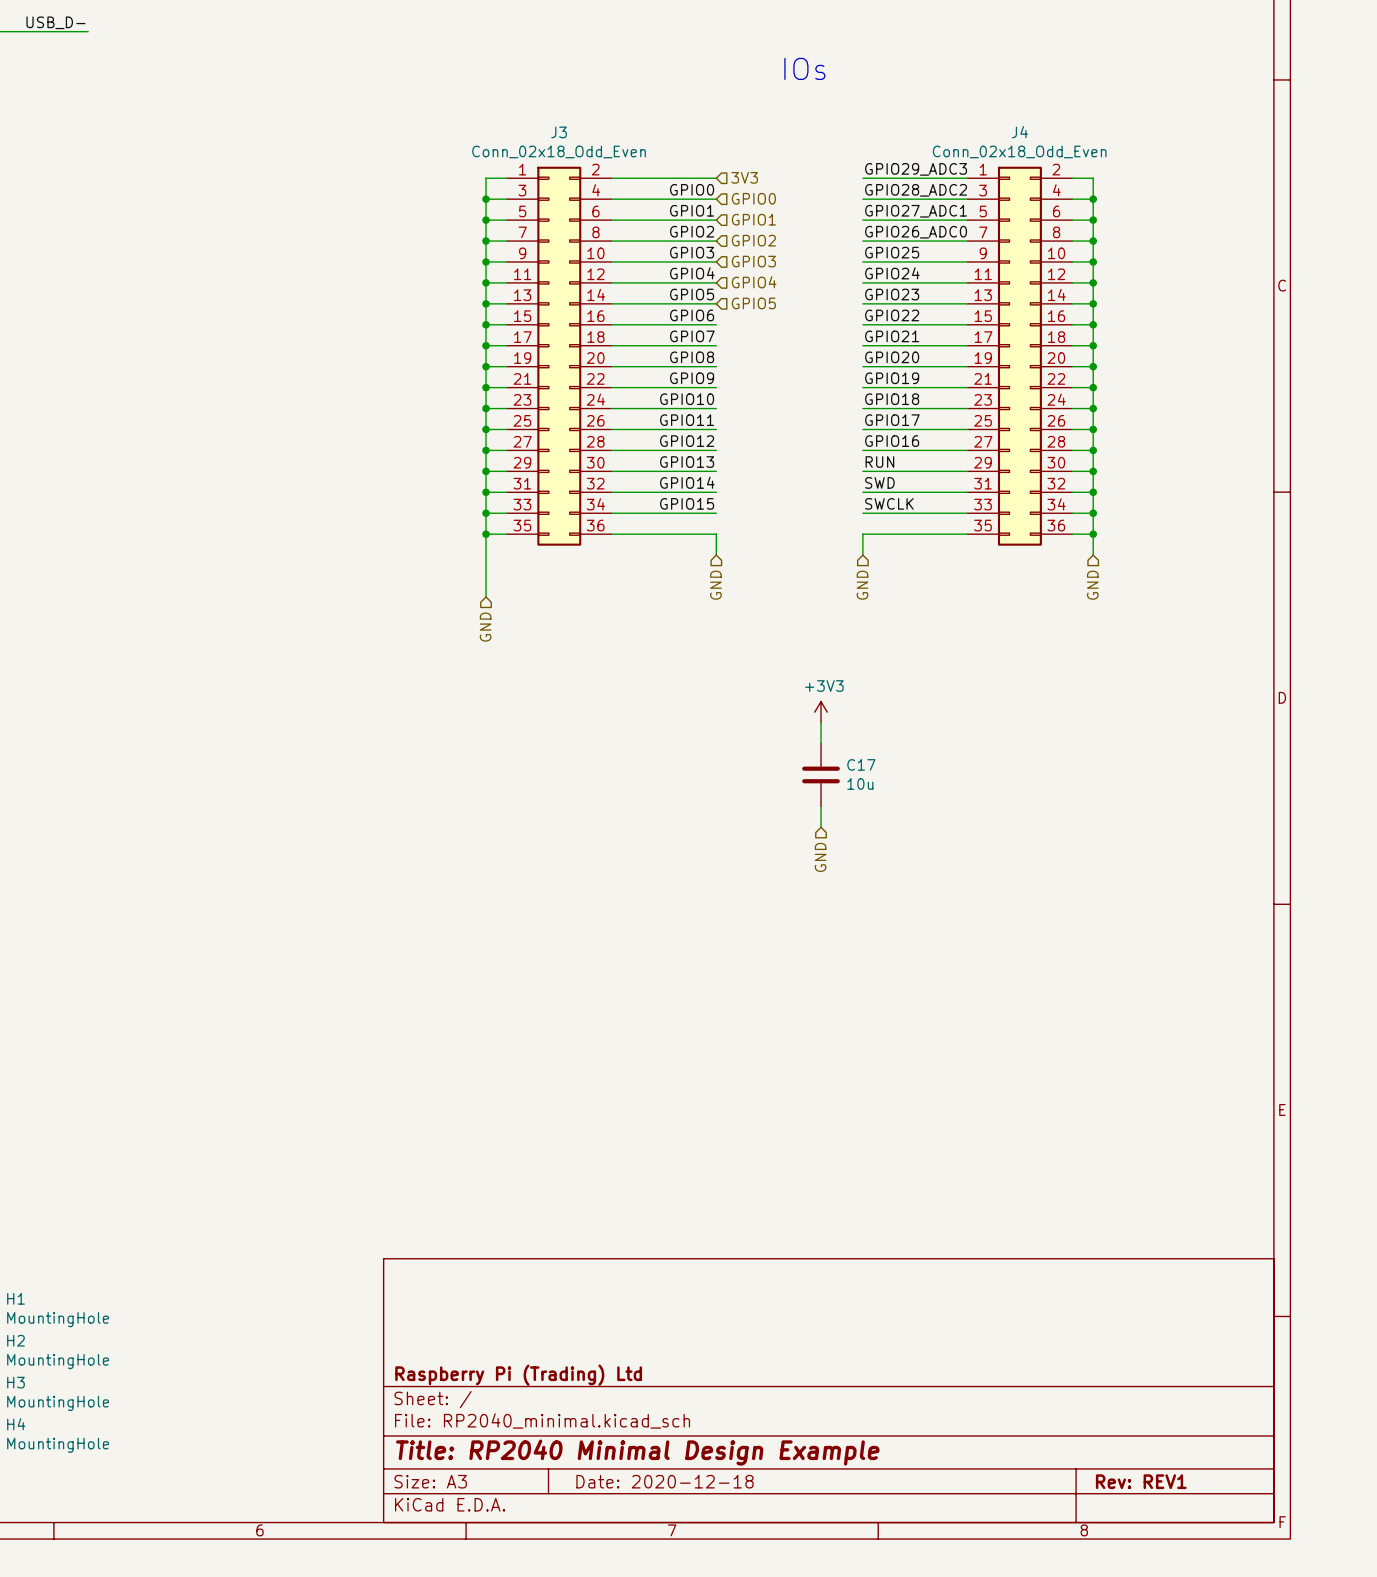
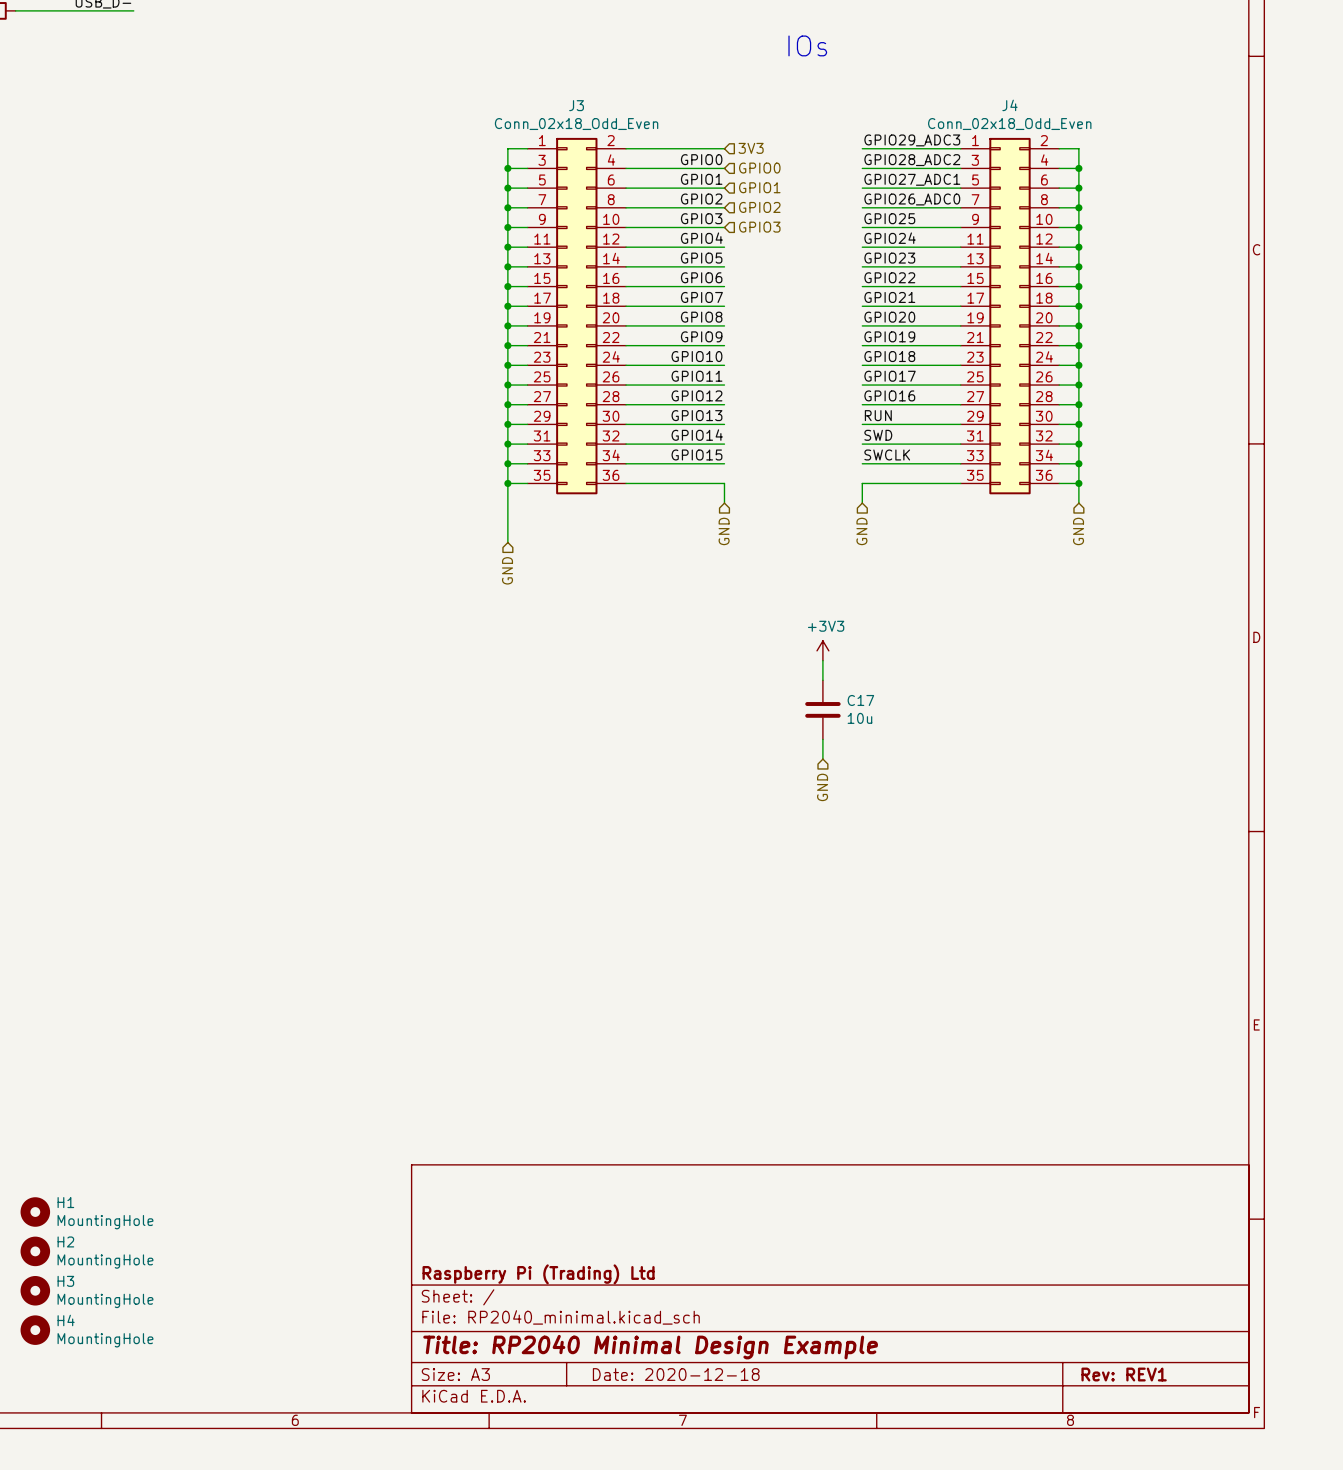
hierarchical label: GPIO4 (754, 282) -> none
hierarchical label: GPIO5 (753, 303) -> none

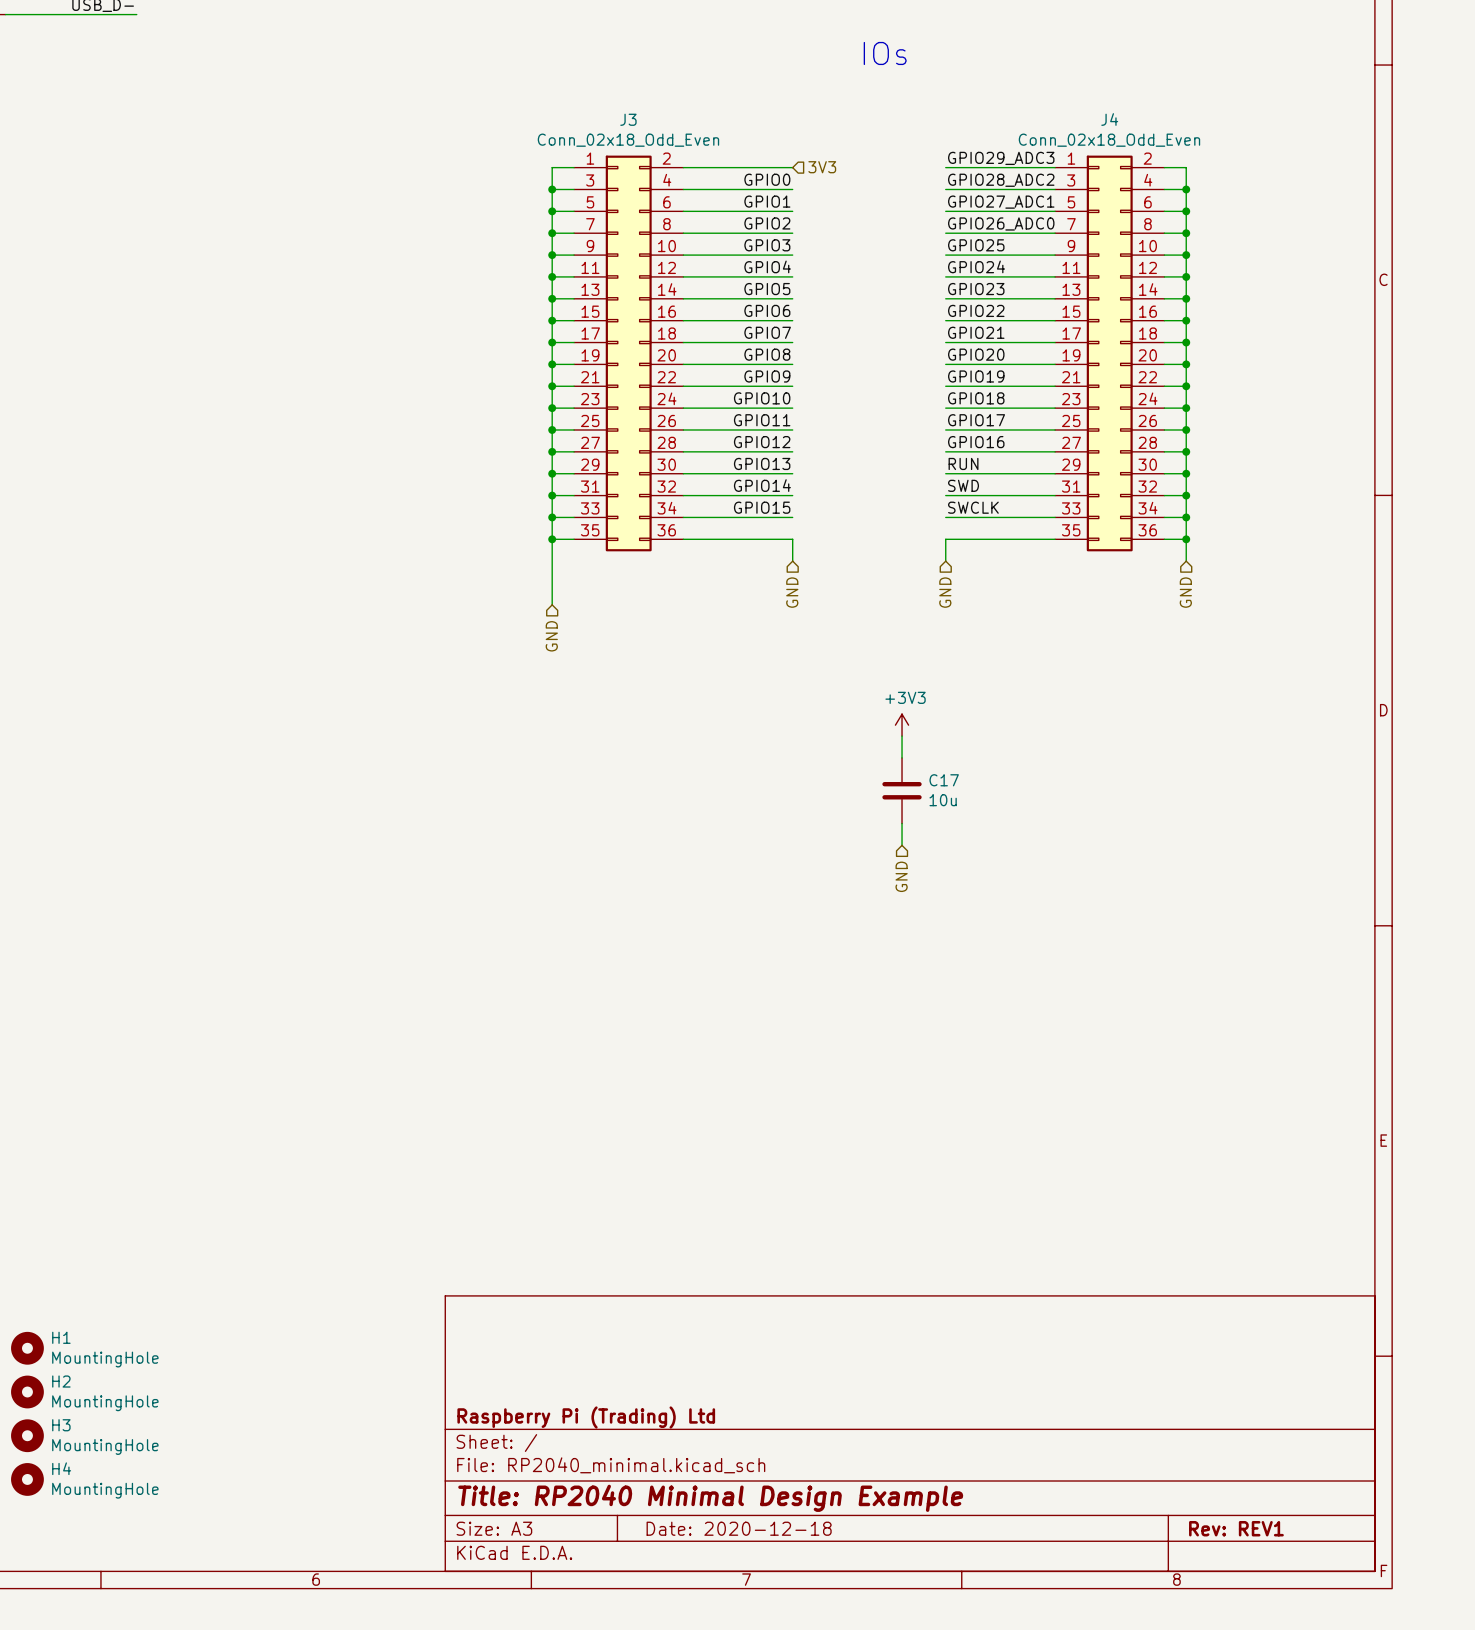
hierarchical label: GPIO0 (759, 168) -> none
hierarchical label: GPIO1 (759, 187) -> none
hierarchical label: GPIO2 (759, 207) -> none
hierarchical label: GPIO3 (759, 227) -> none

